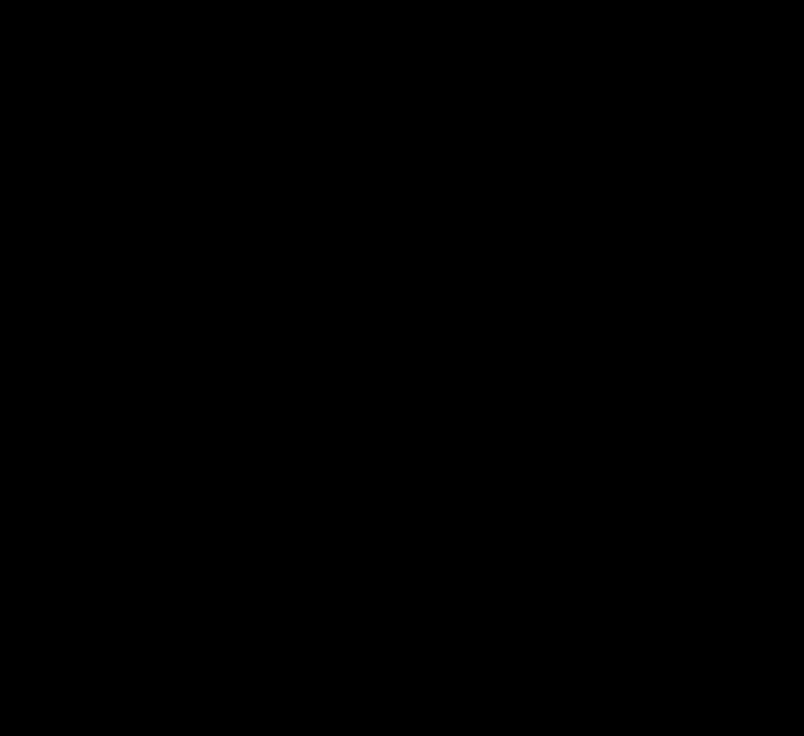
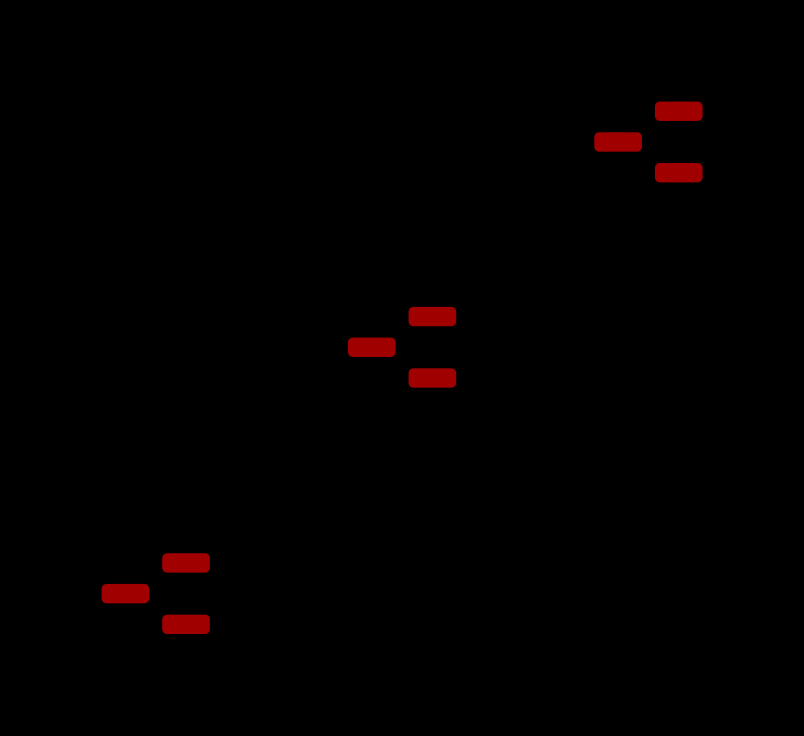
part: none -> (648, 141)
part: none -> (402, 347)
part: none -> (155, 593)

